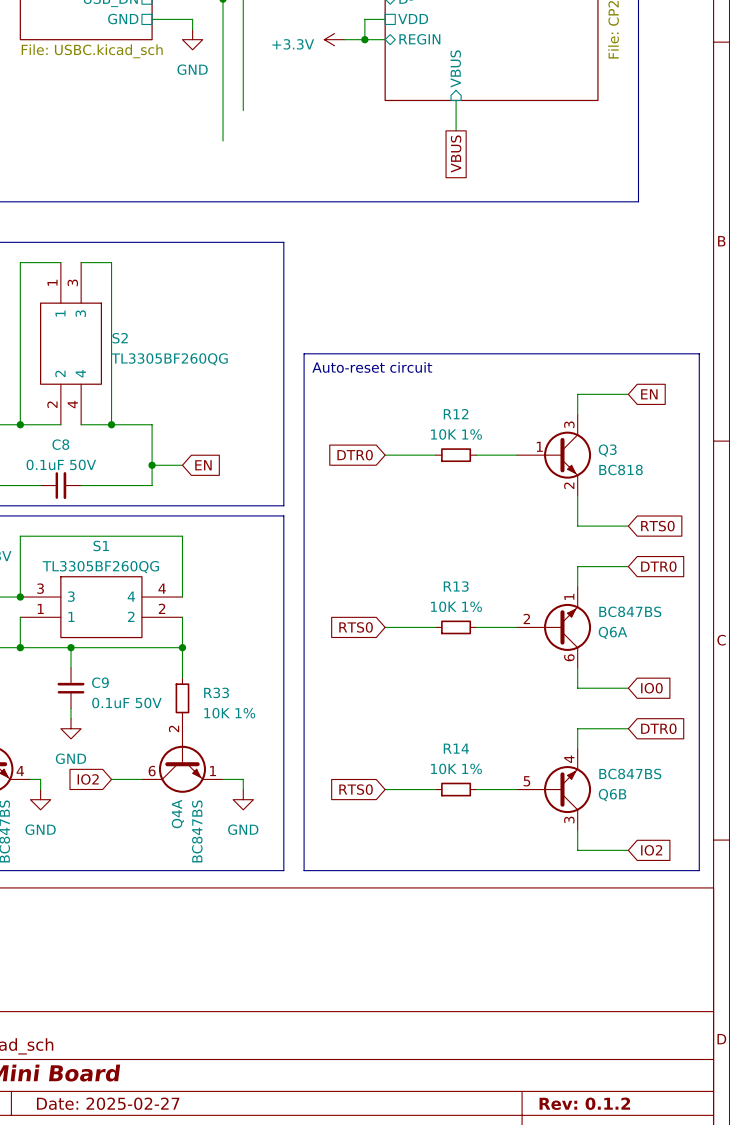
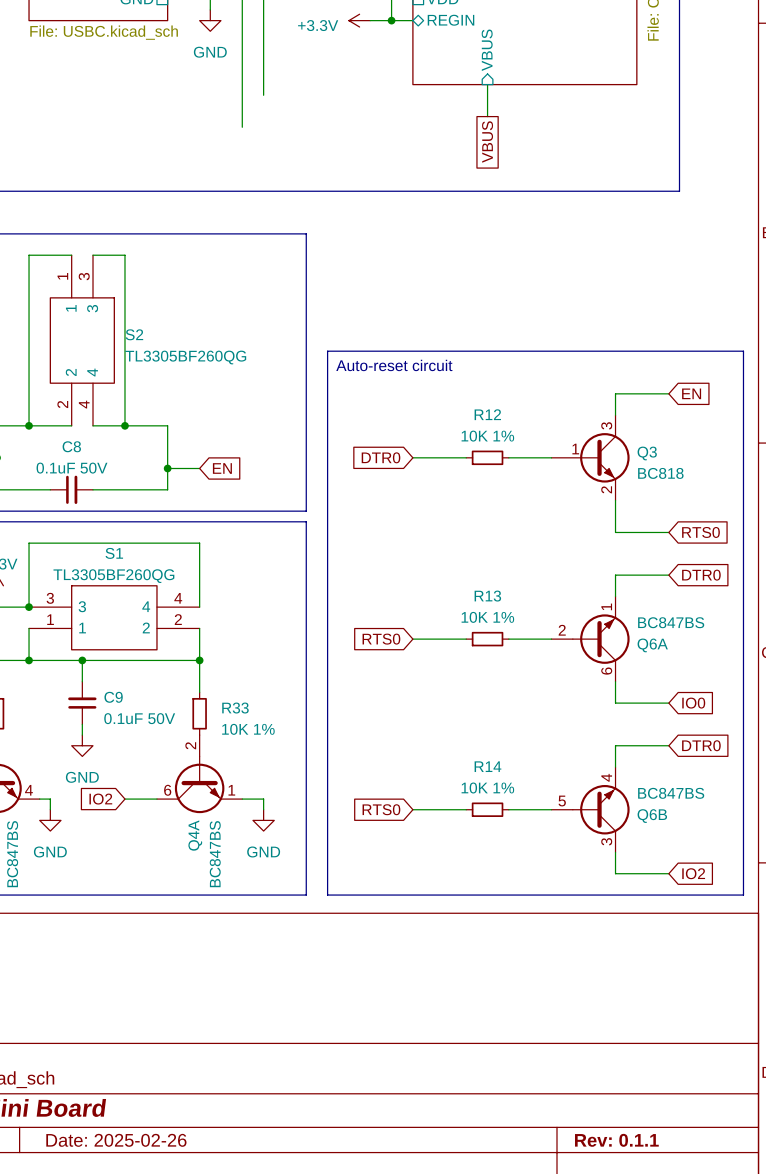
title block: Date: 2025-02-27 (108, 1103) -> Date: 2025-02-26 (116, 1140)
title block: Rev: 0.1.2 (584, 1103) -> Rev: 0.1.1 (616, 1140)

